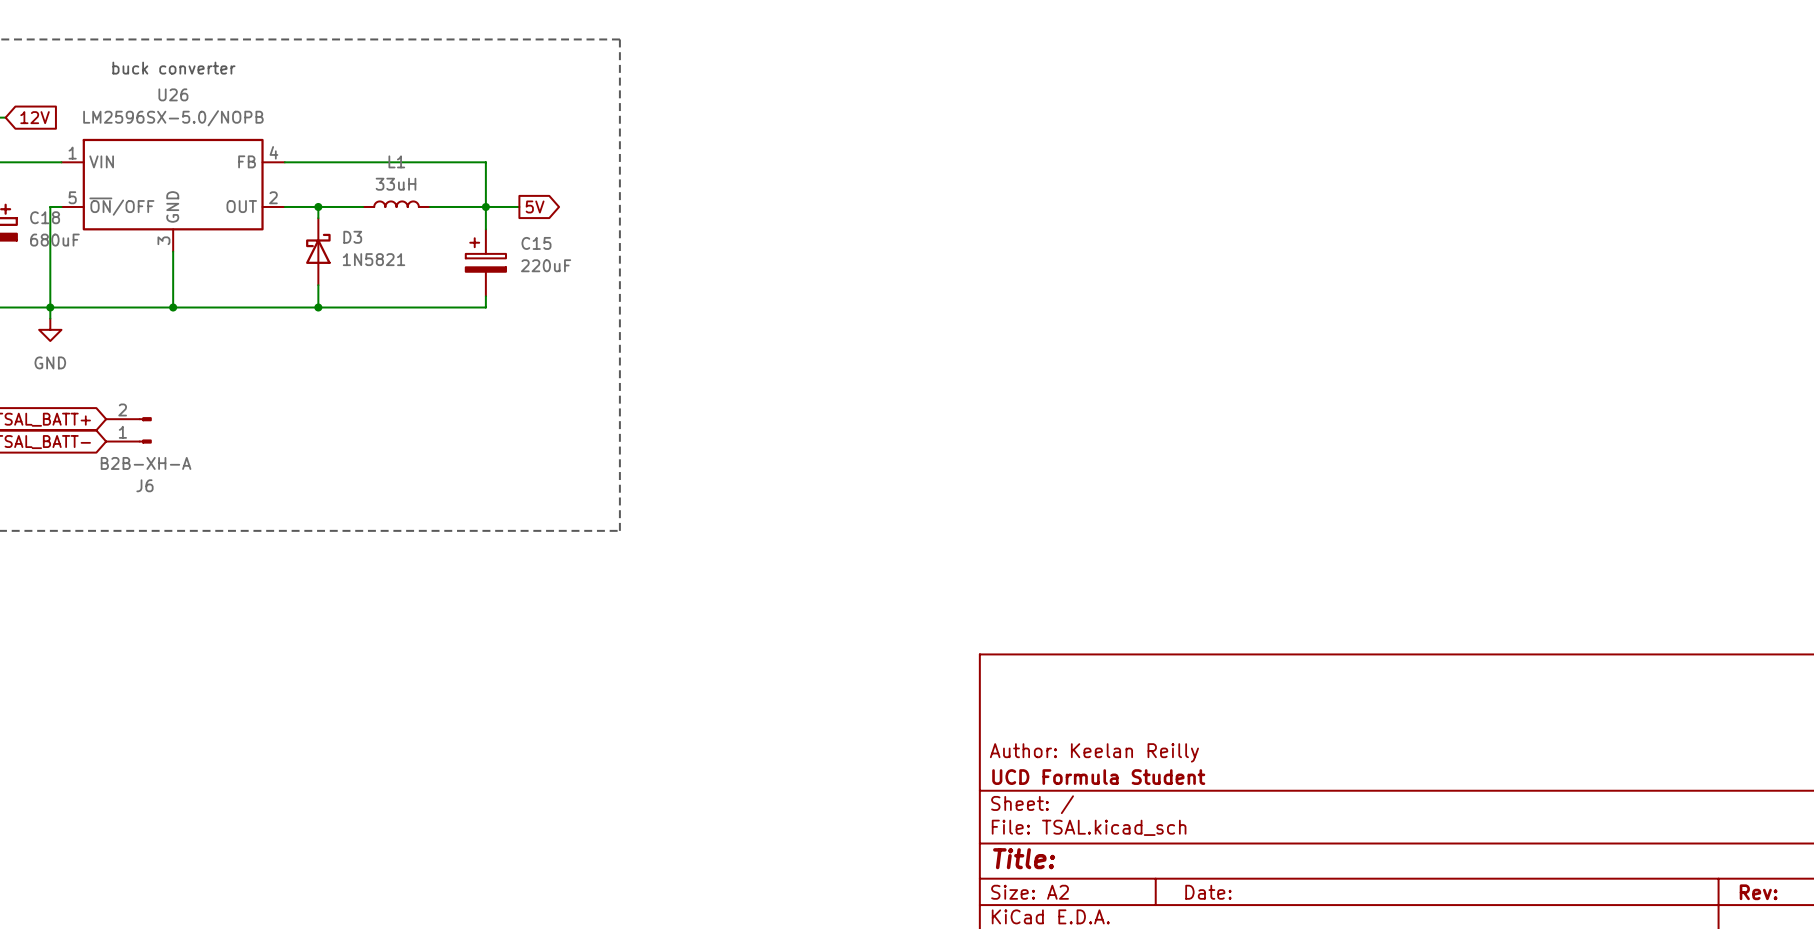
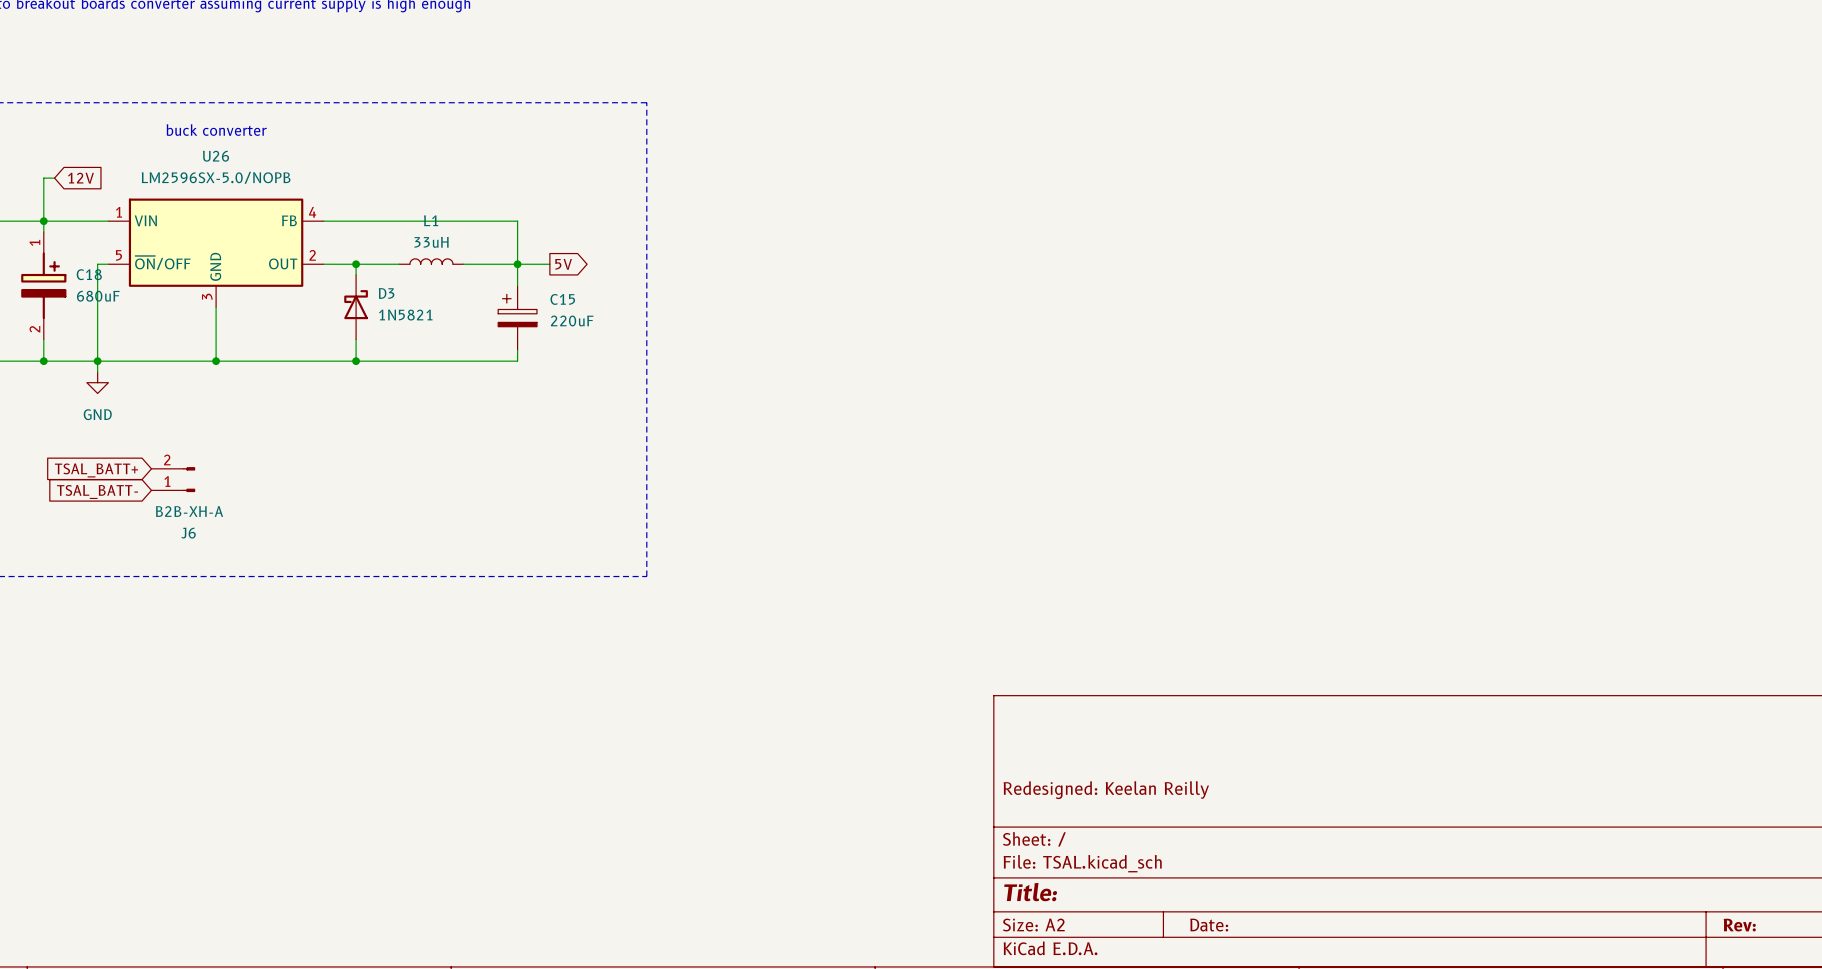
title block: Author: Keelan Reilly (1094, 752) -> Redesigned: Keelan Reilly (1106, 790)
title block: UCD Formula Student (1098, 777) -> none

